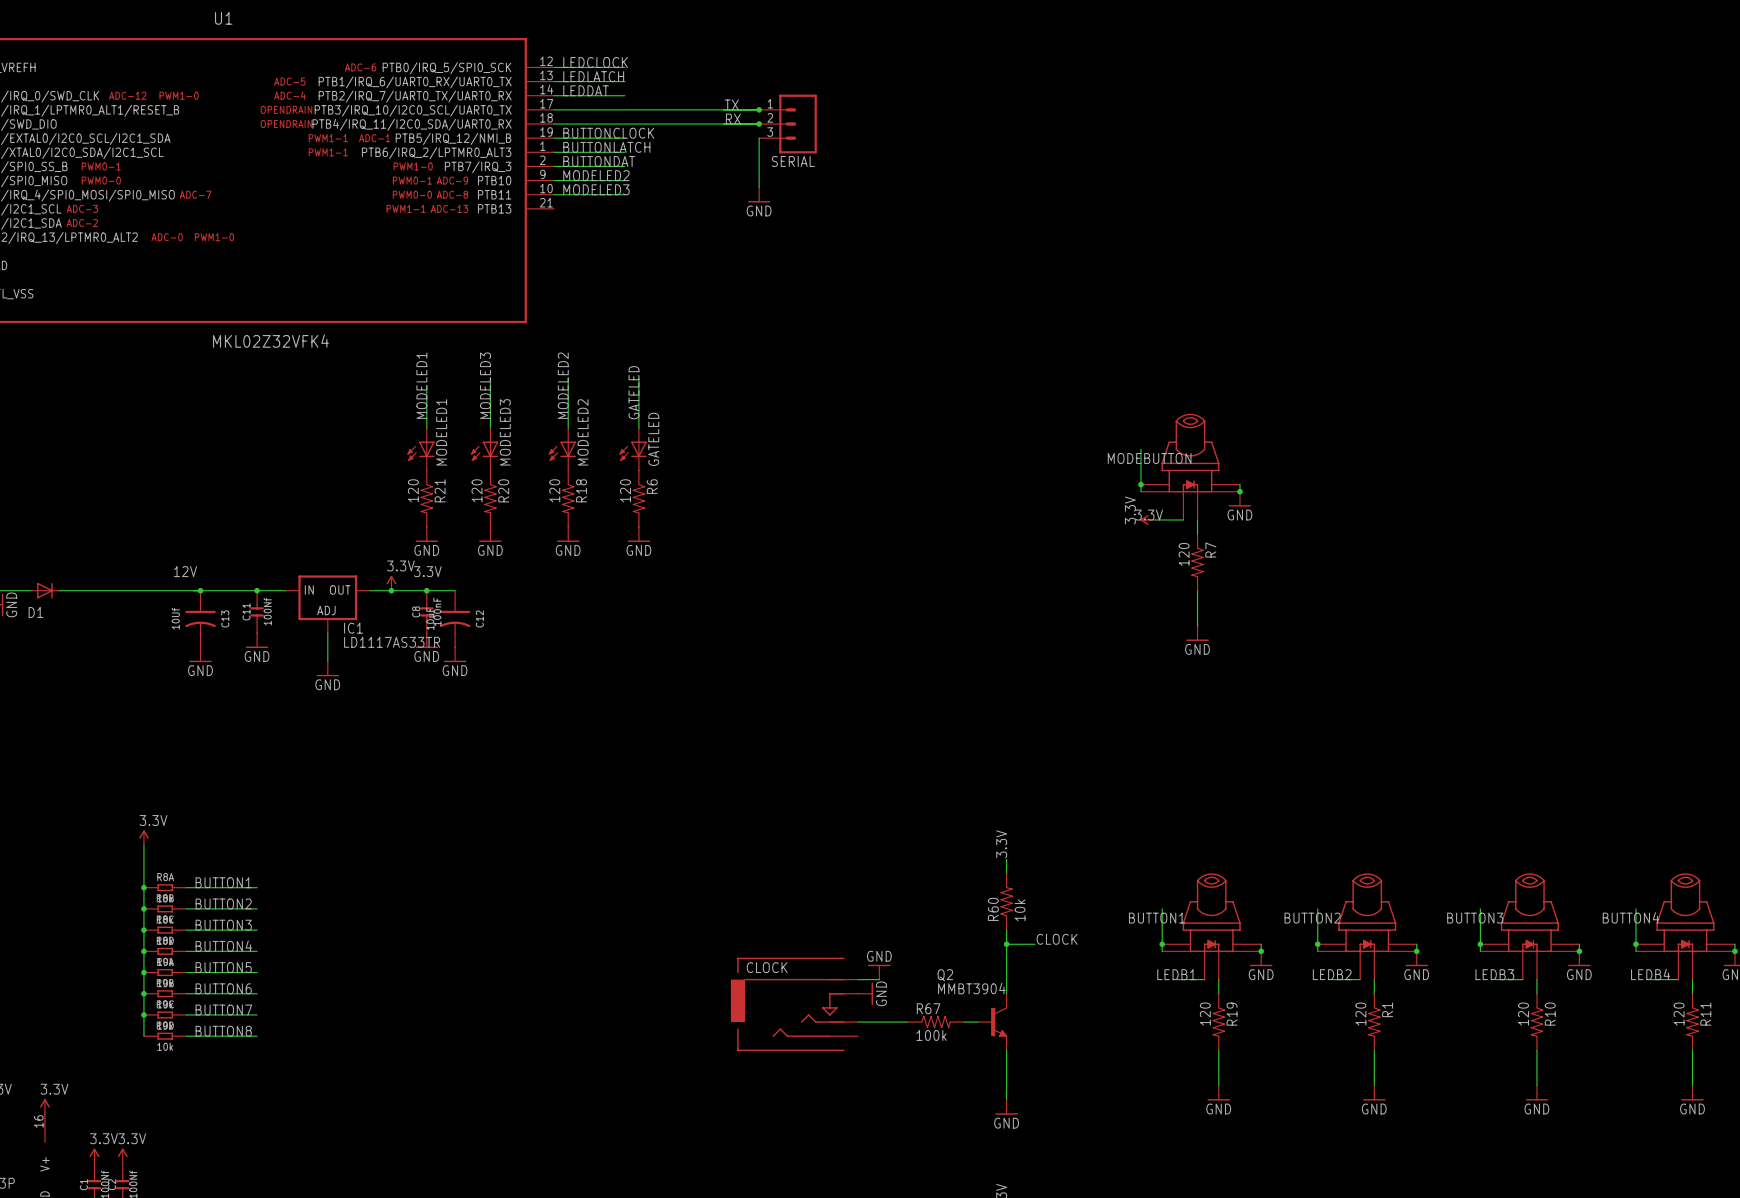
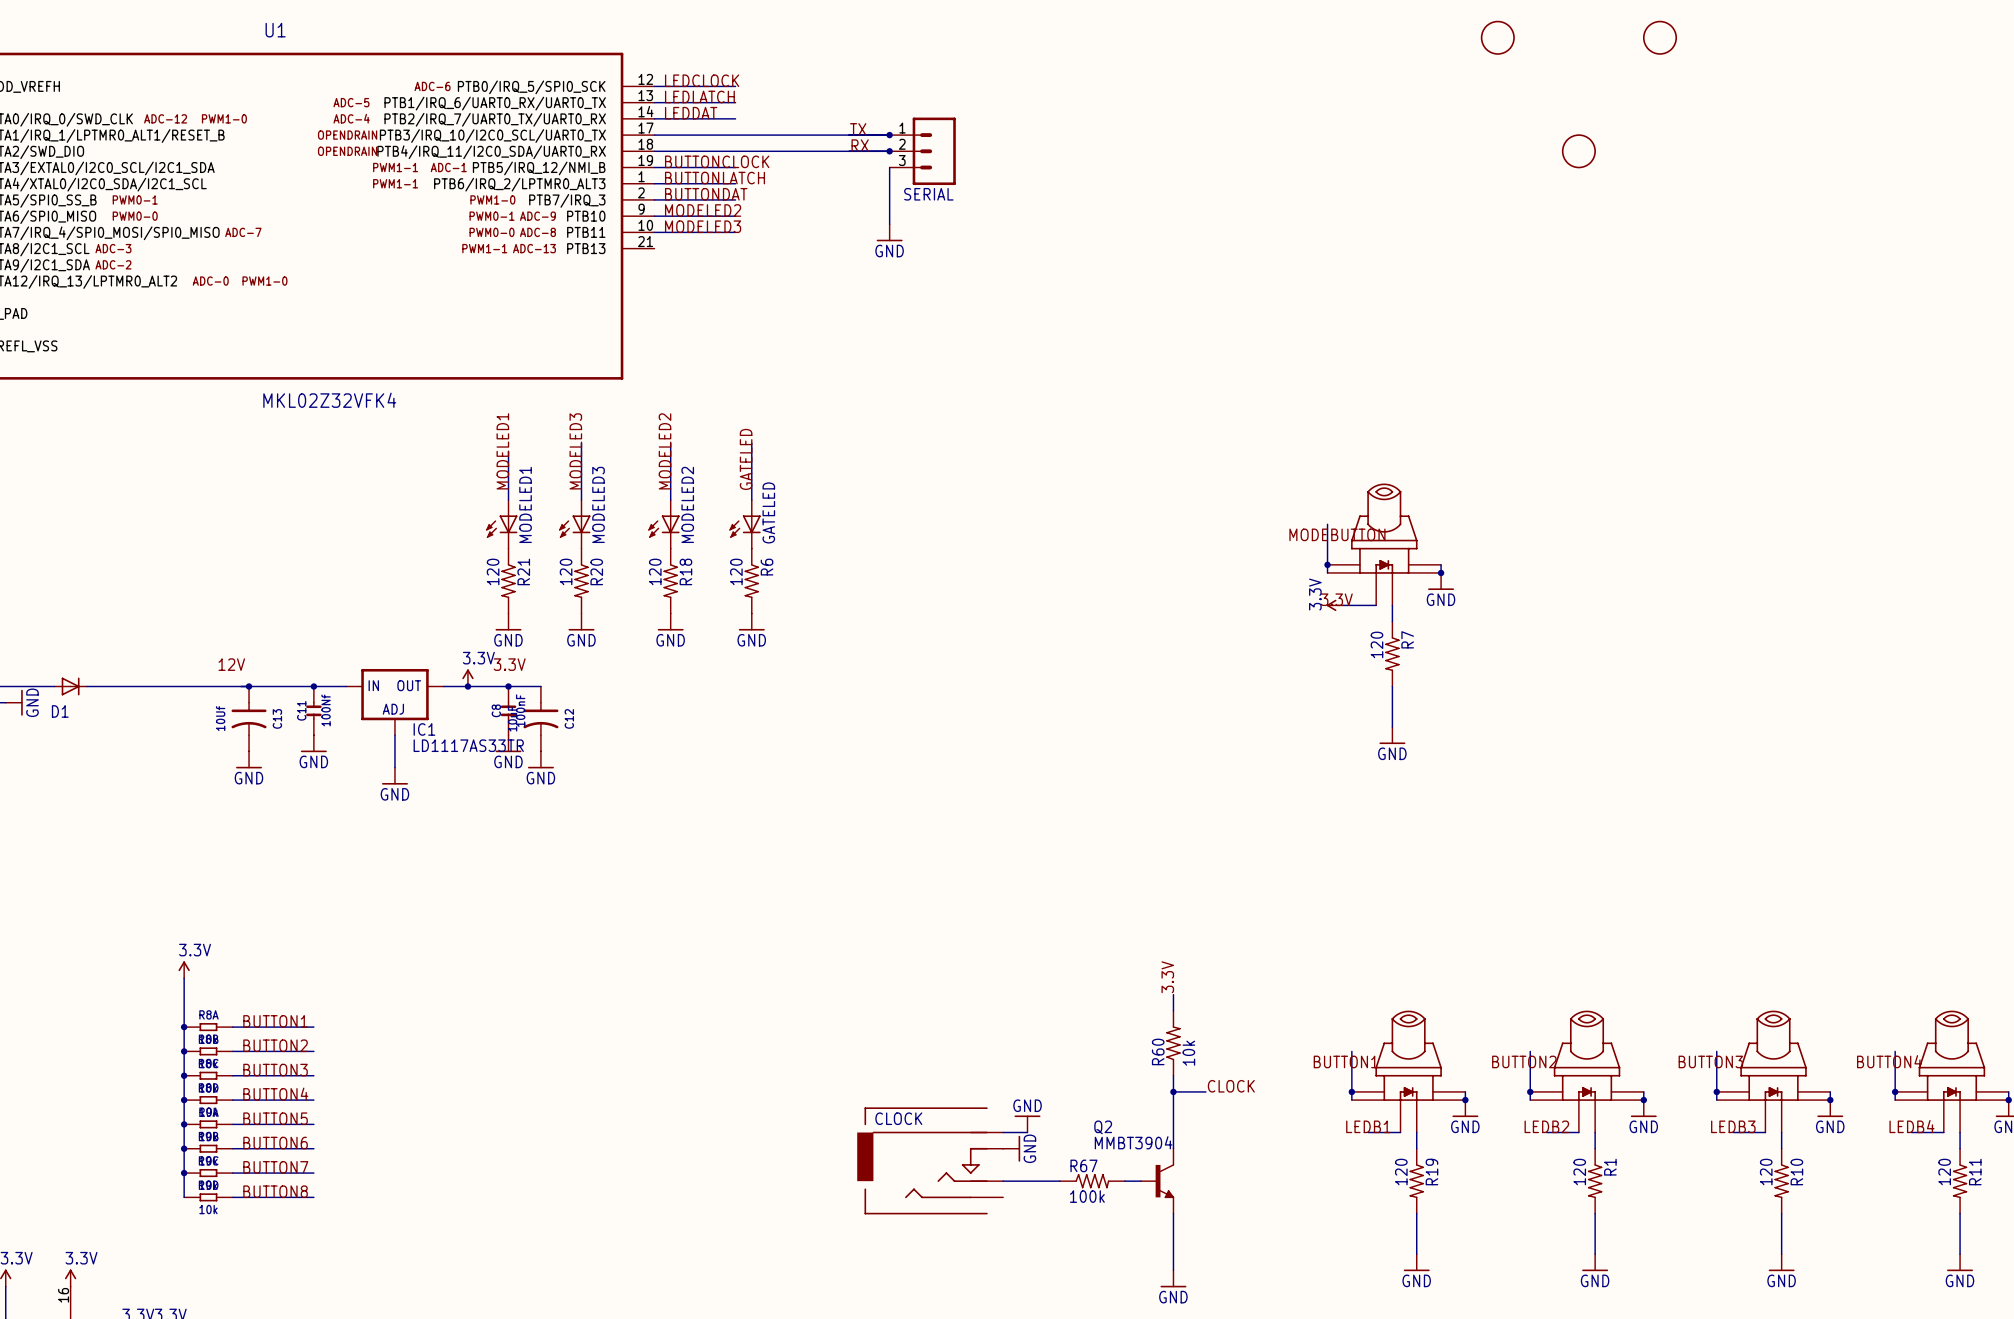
part: none -> (1497, 37)
part: none -> (1660, 37)
part: none -> (1578, 151)

